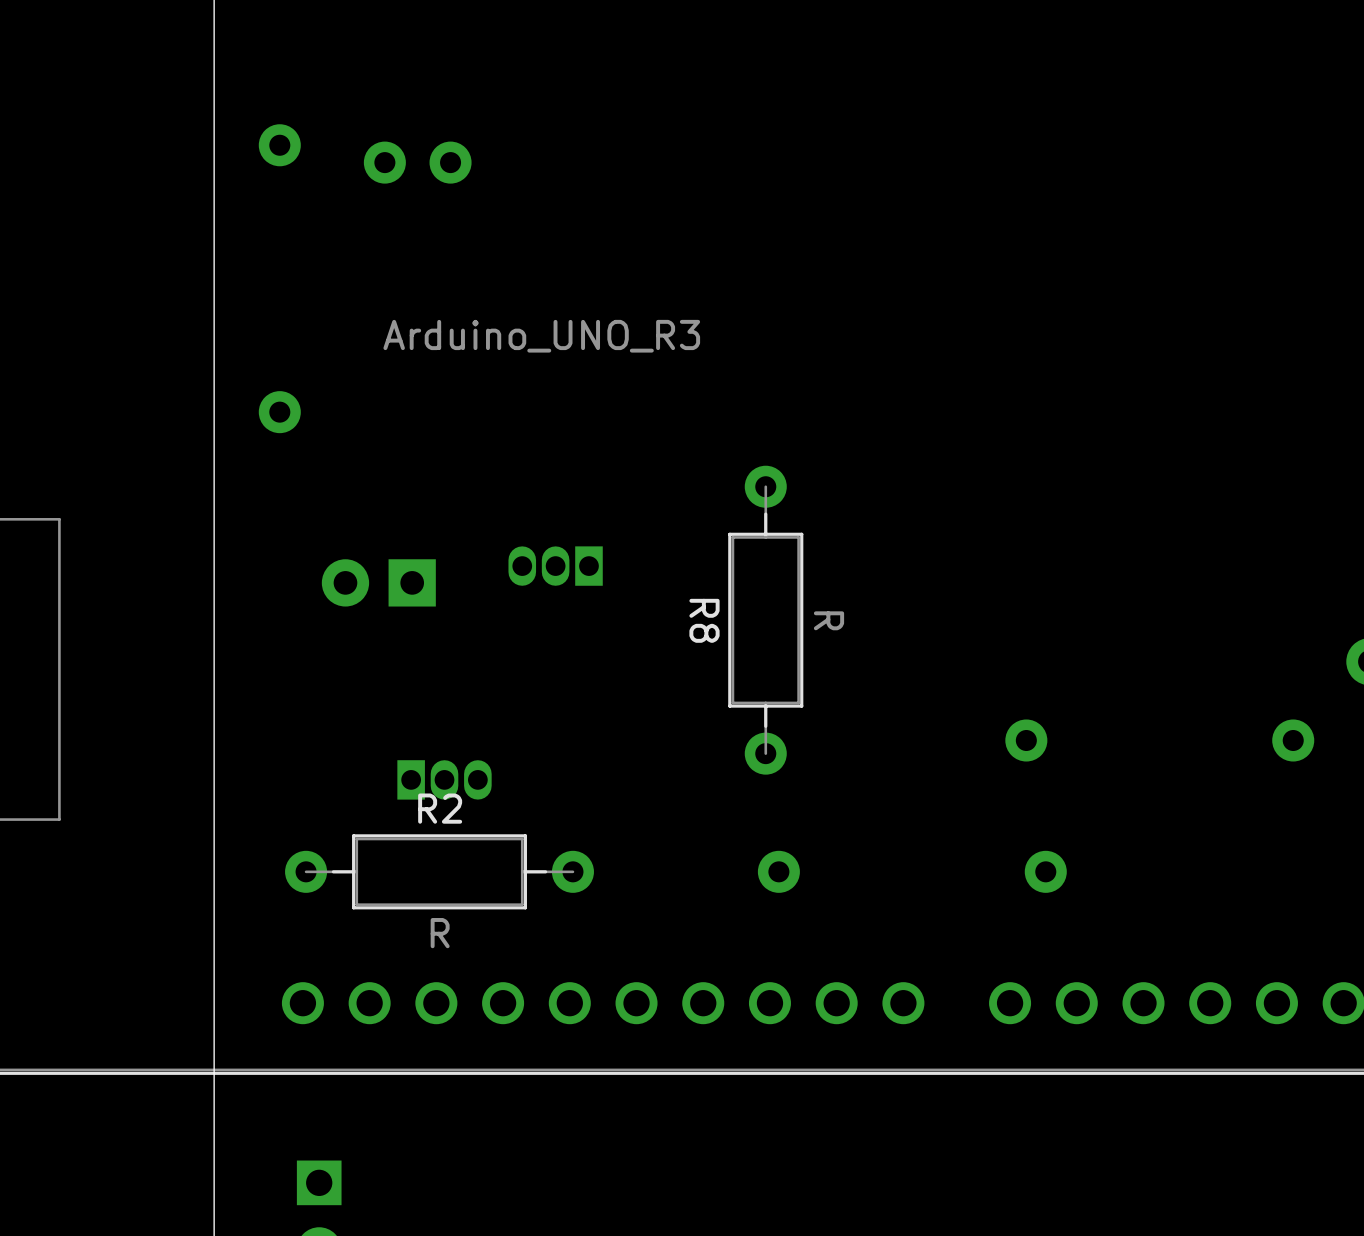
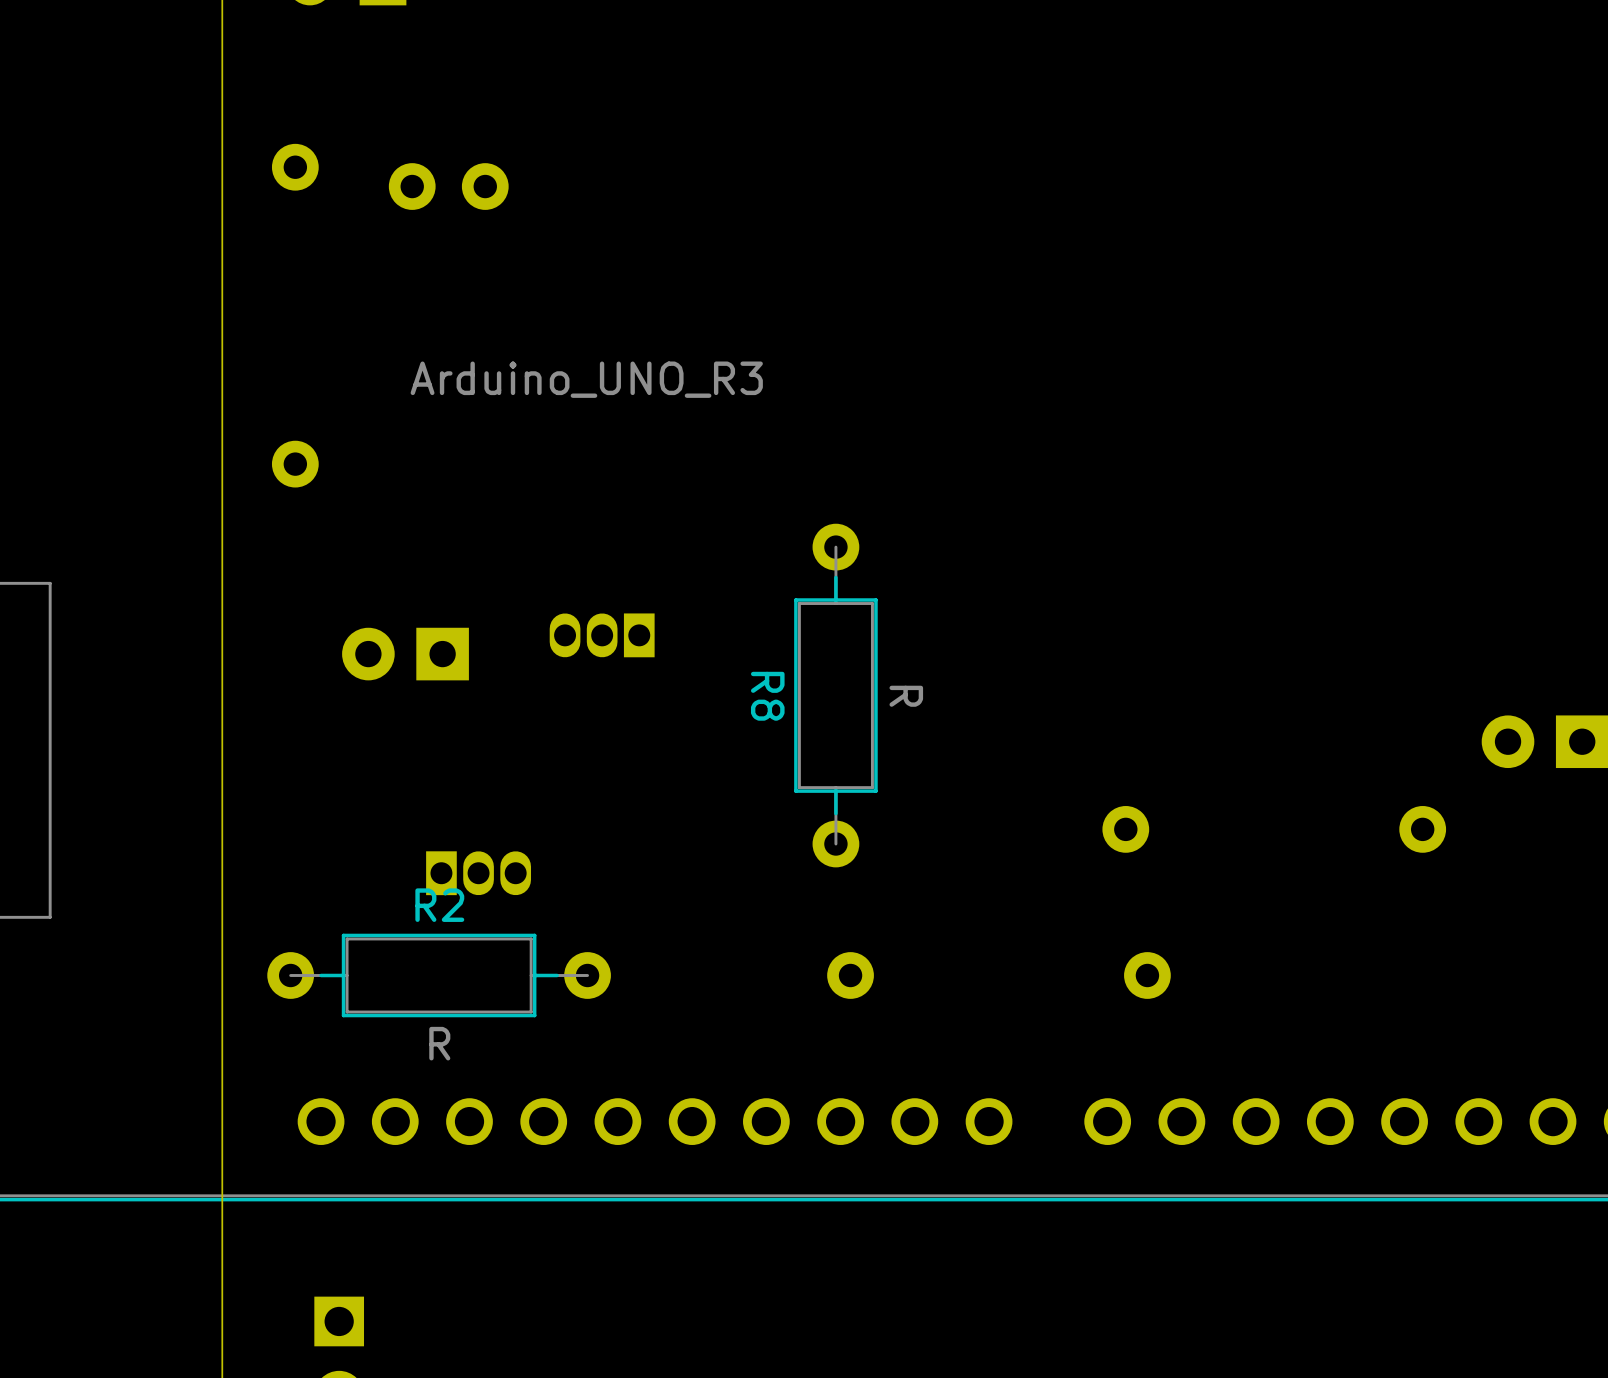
R2 position: (439, 871) -> (439, 975)

